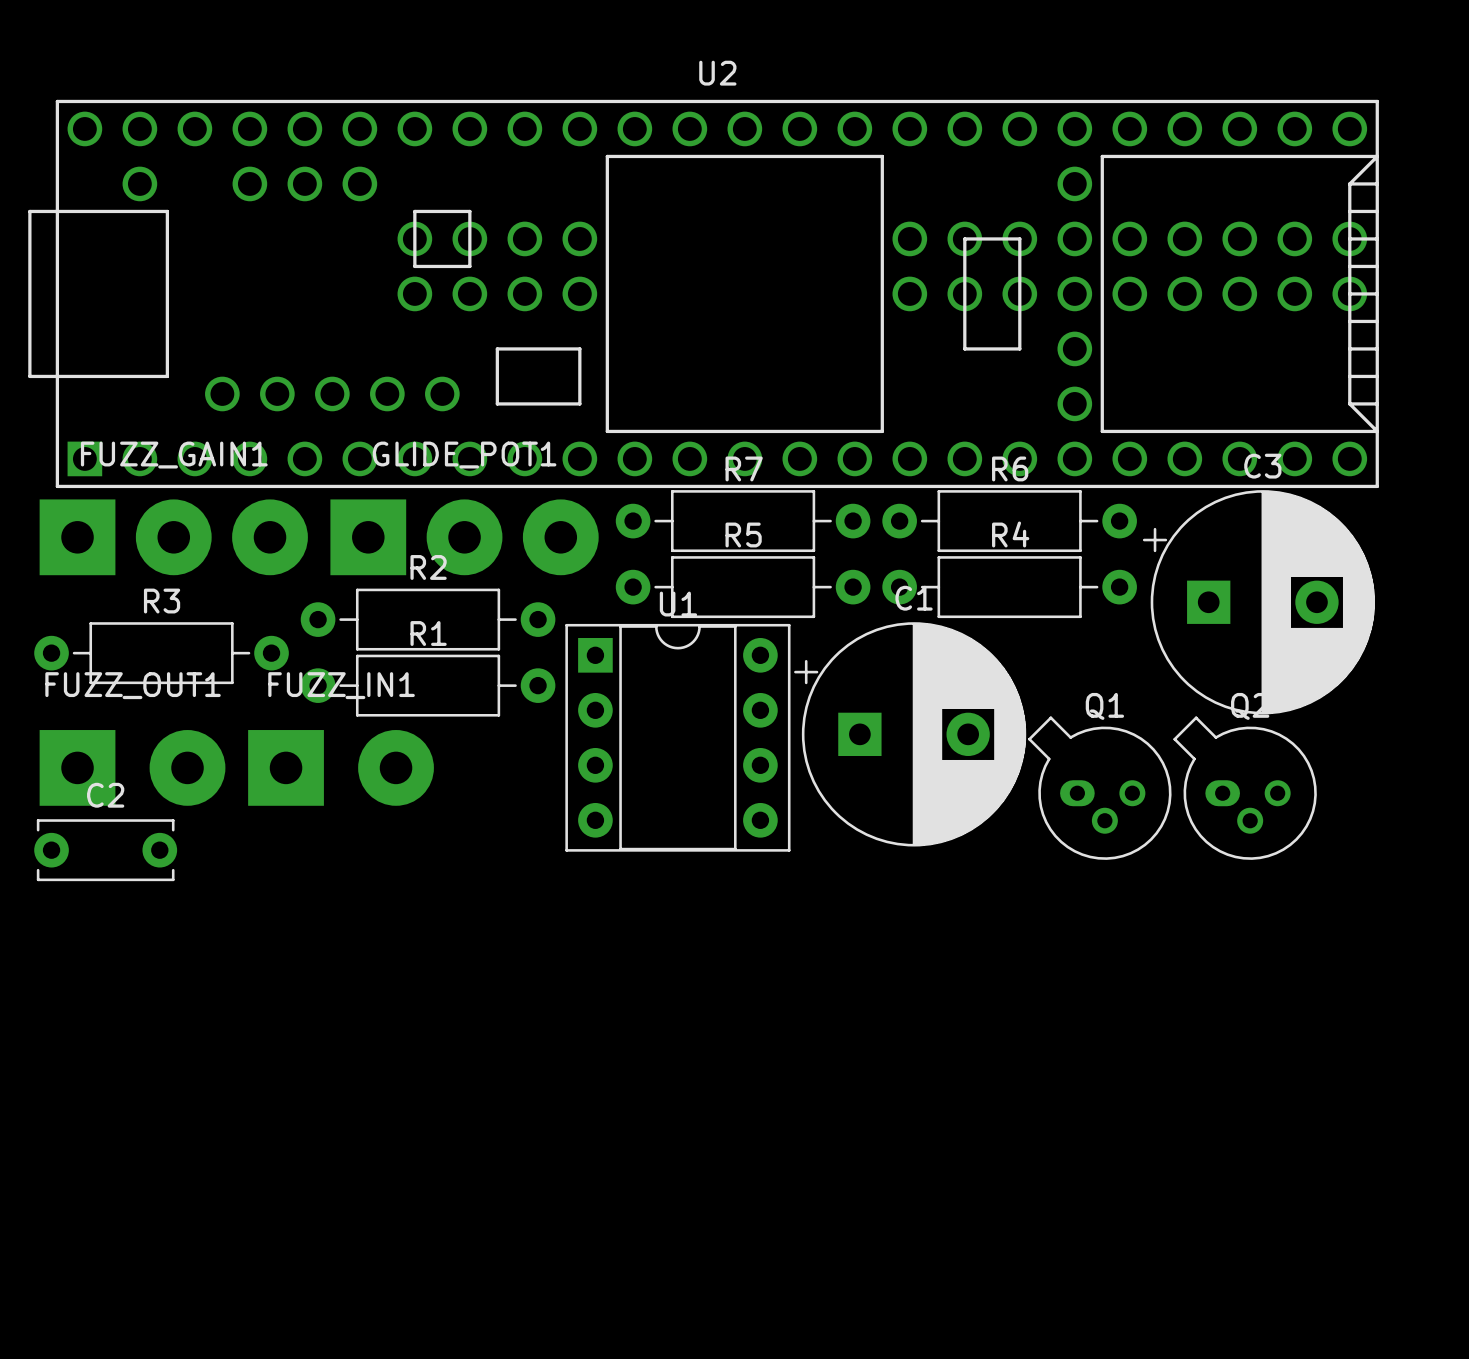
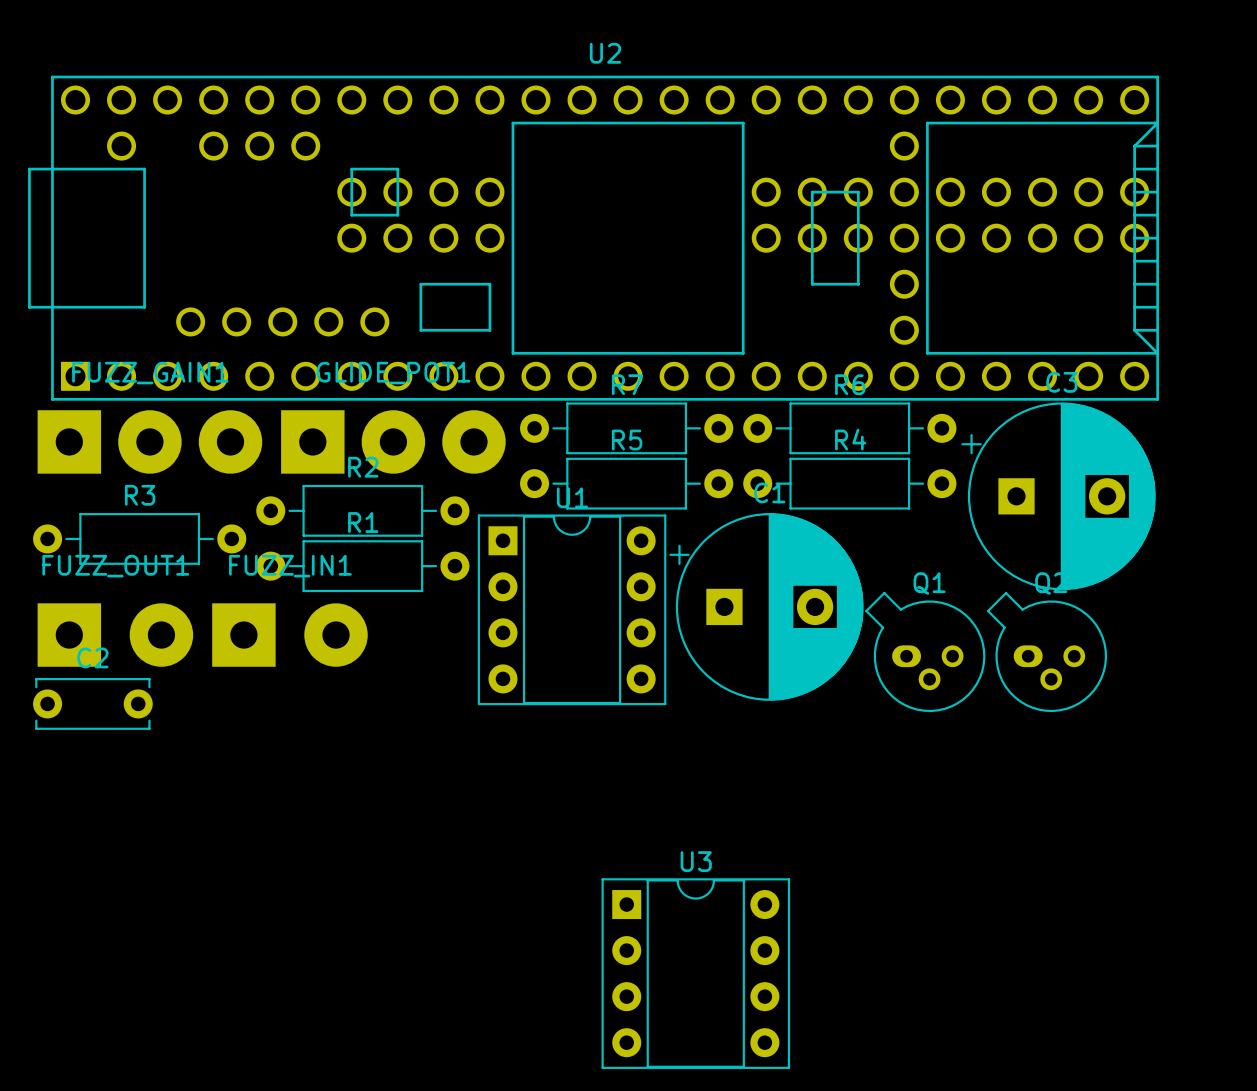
U3: none -> (695, 973)

